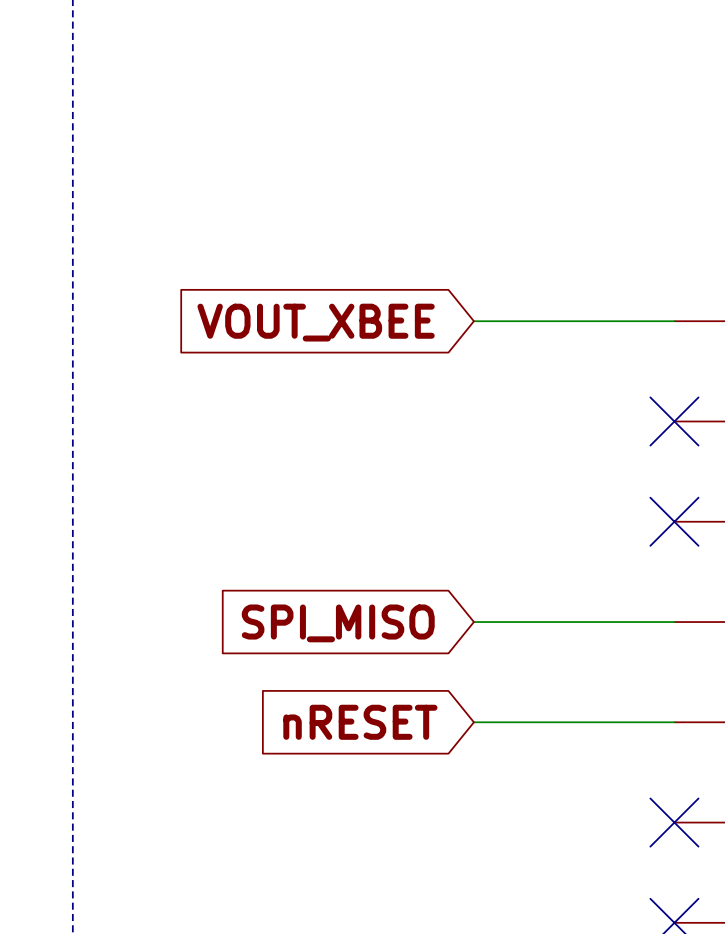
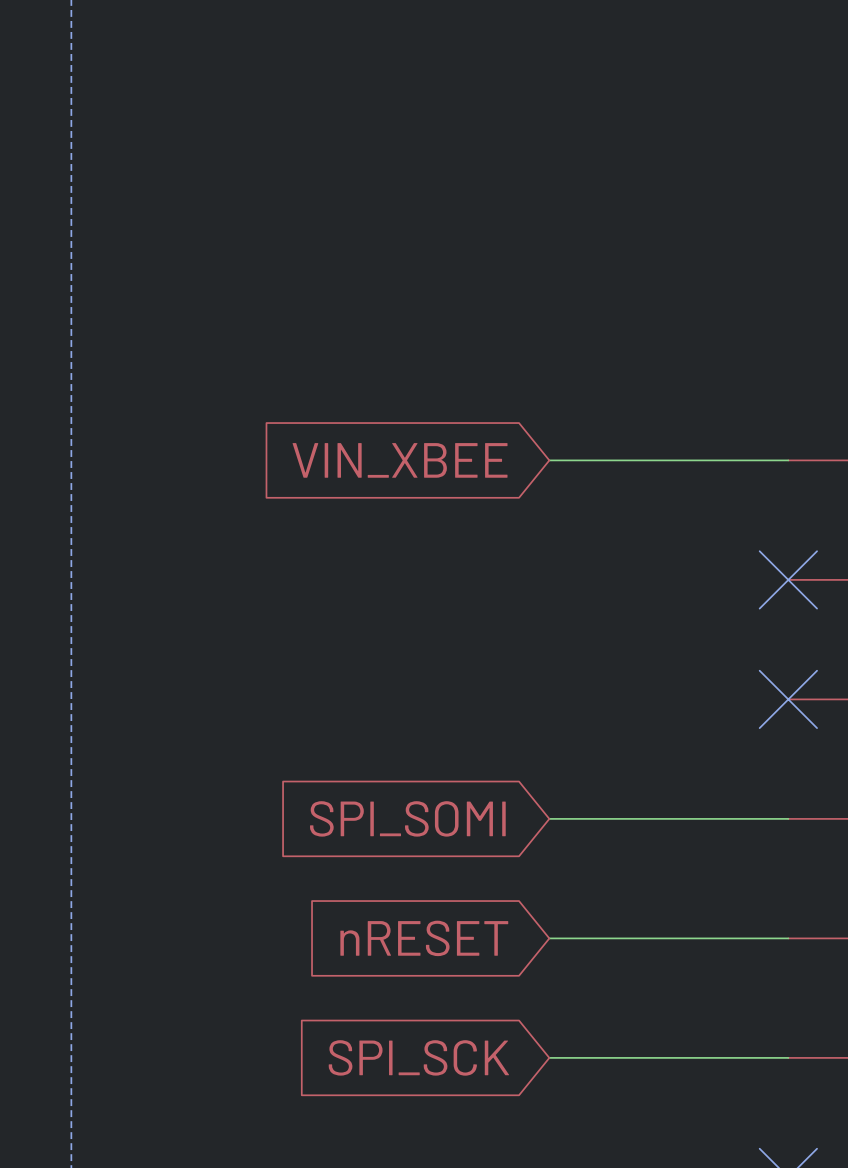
global label: VOUT_XBEE (316, 322) -> VIN_XBEE (400, 460)
global label: SPI_MISO (338, 623) -> SPI_SOMI (407, 818)
wire: none -> (549, 1057) (788, 1057)
no-connect mark: (674, 822) -> none
global label: none -> SPI_SCK (418, 1057)

